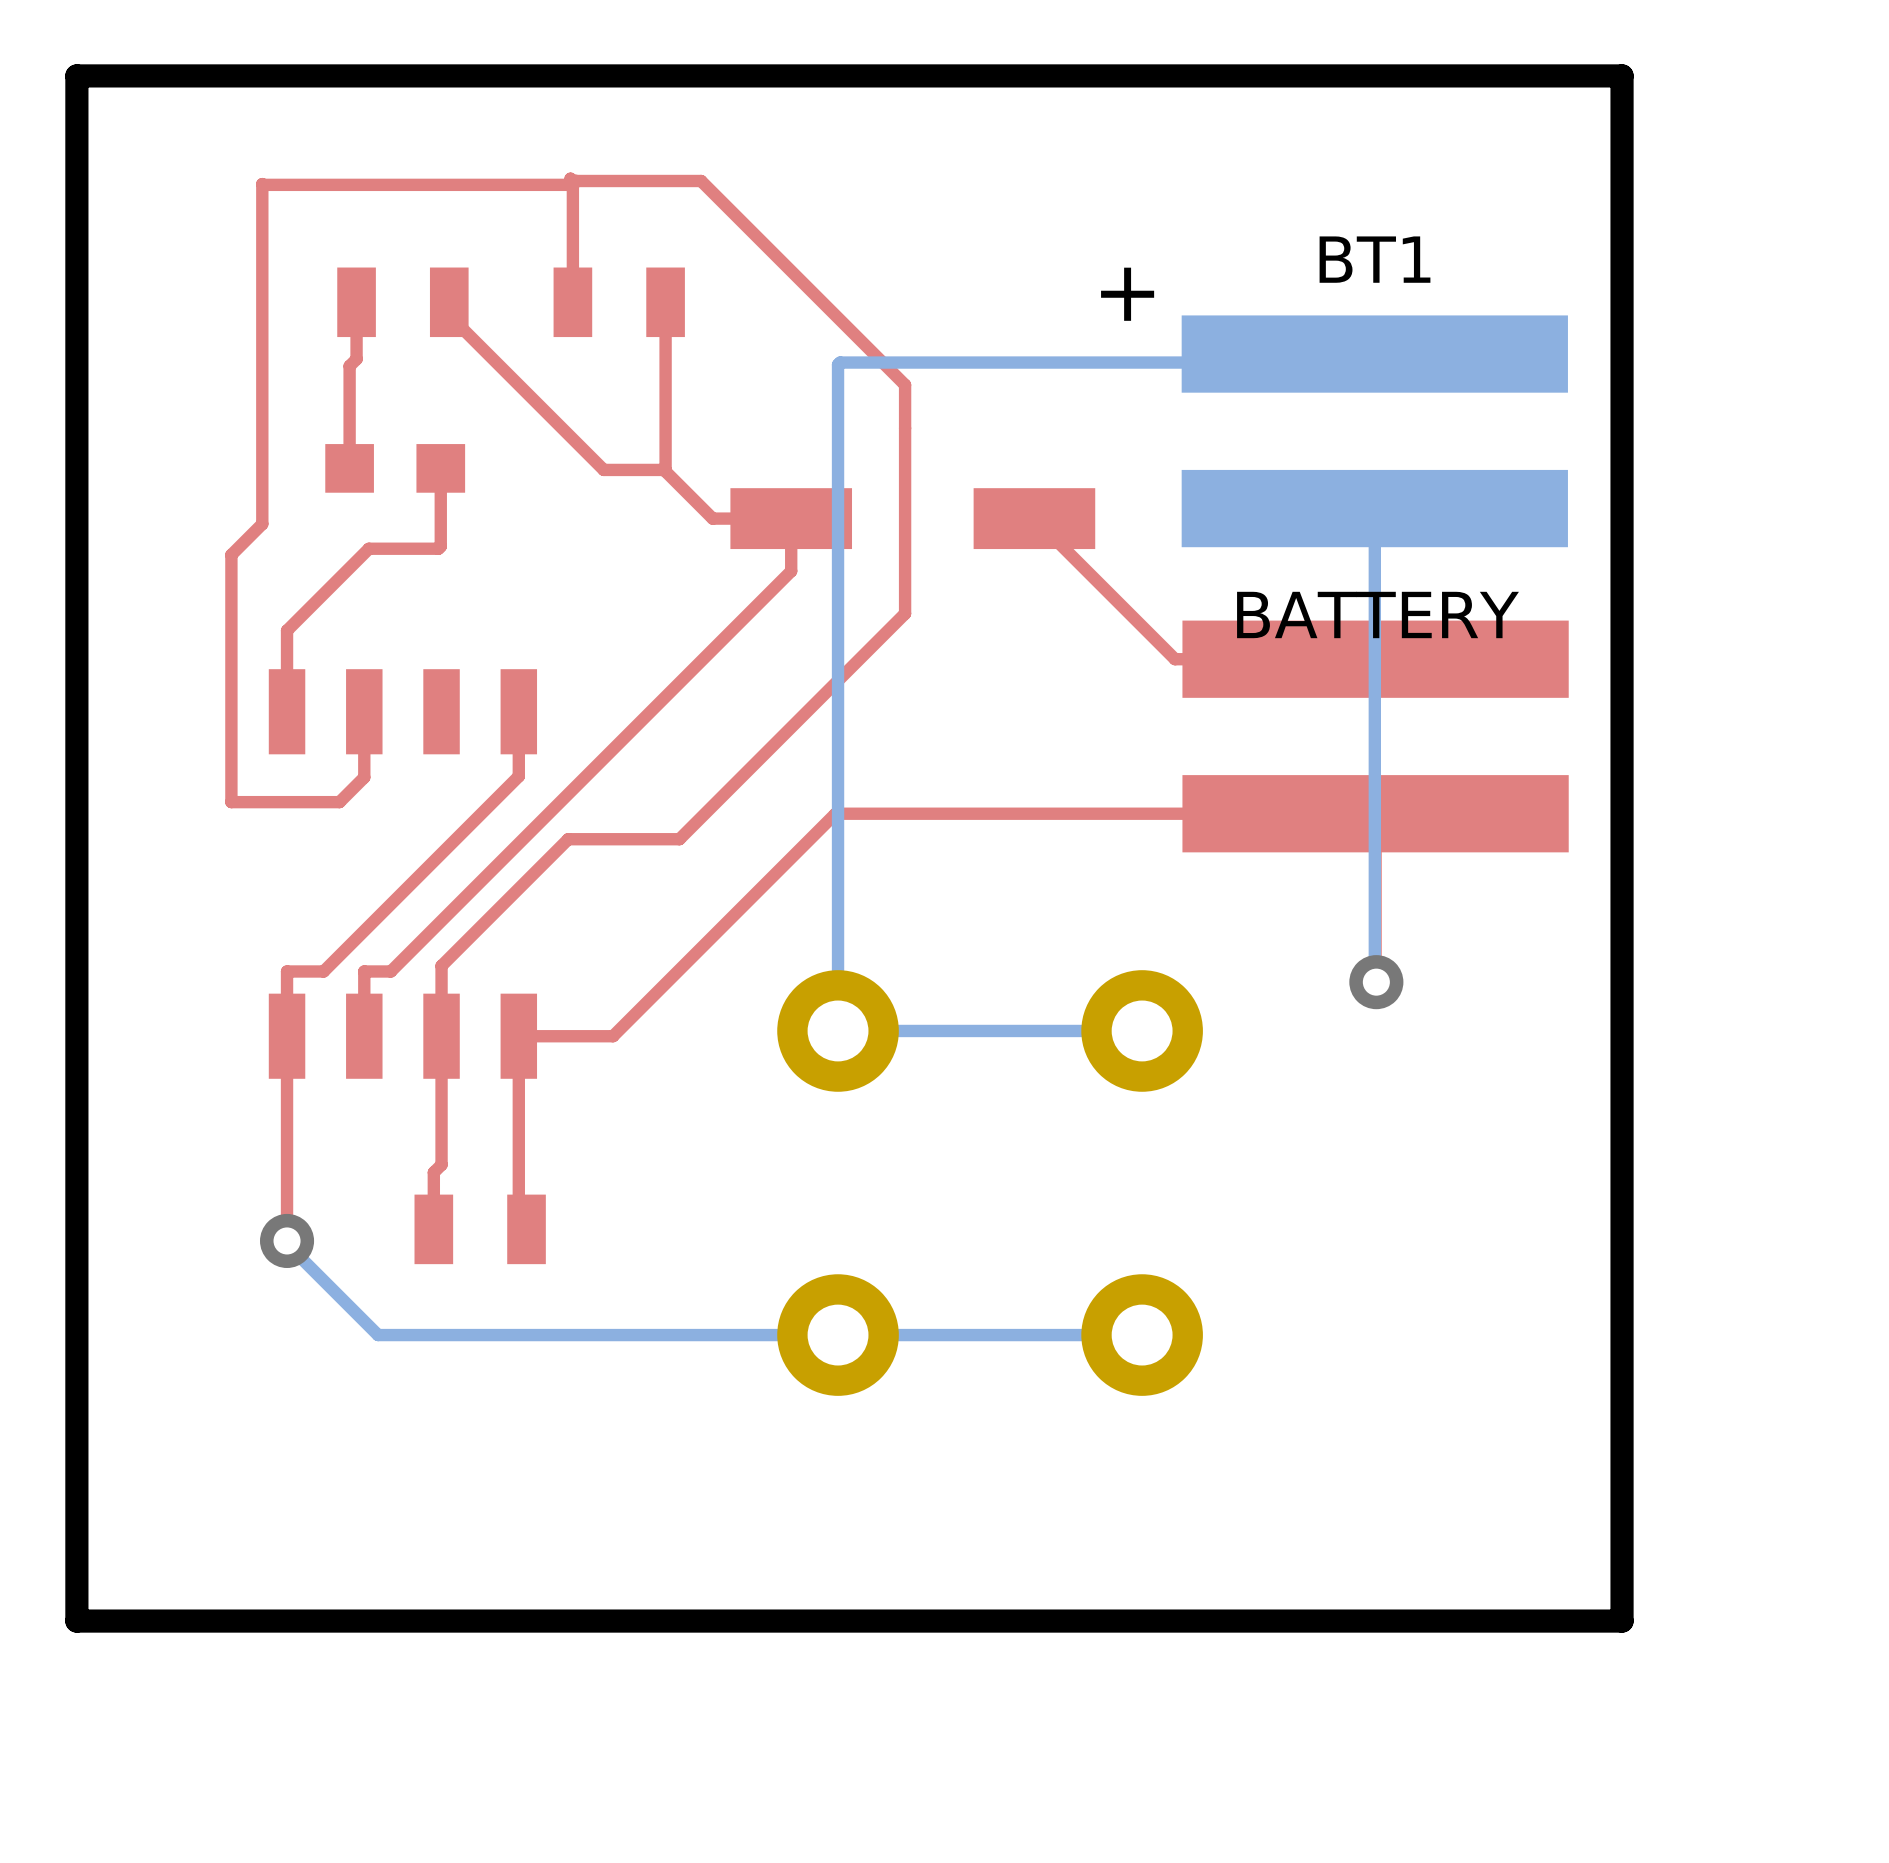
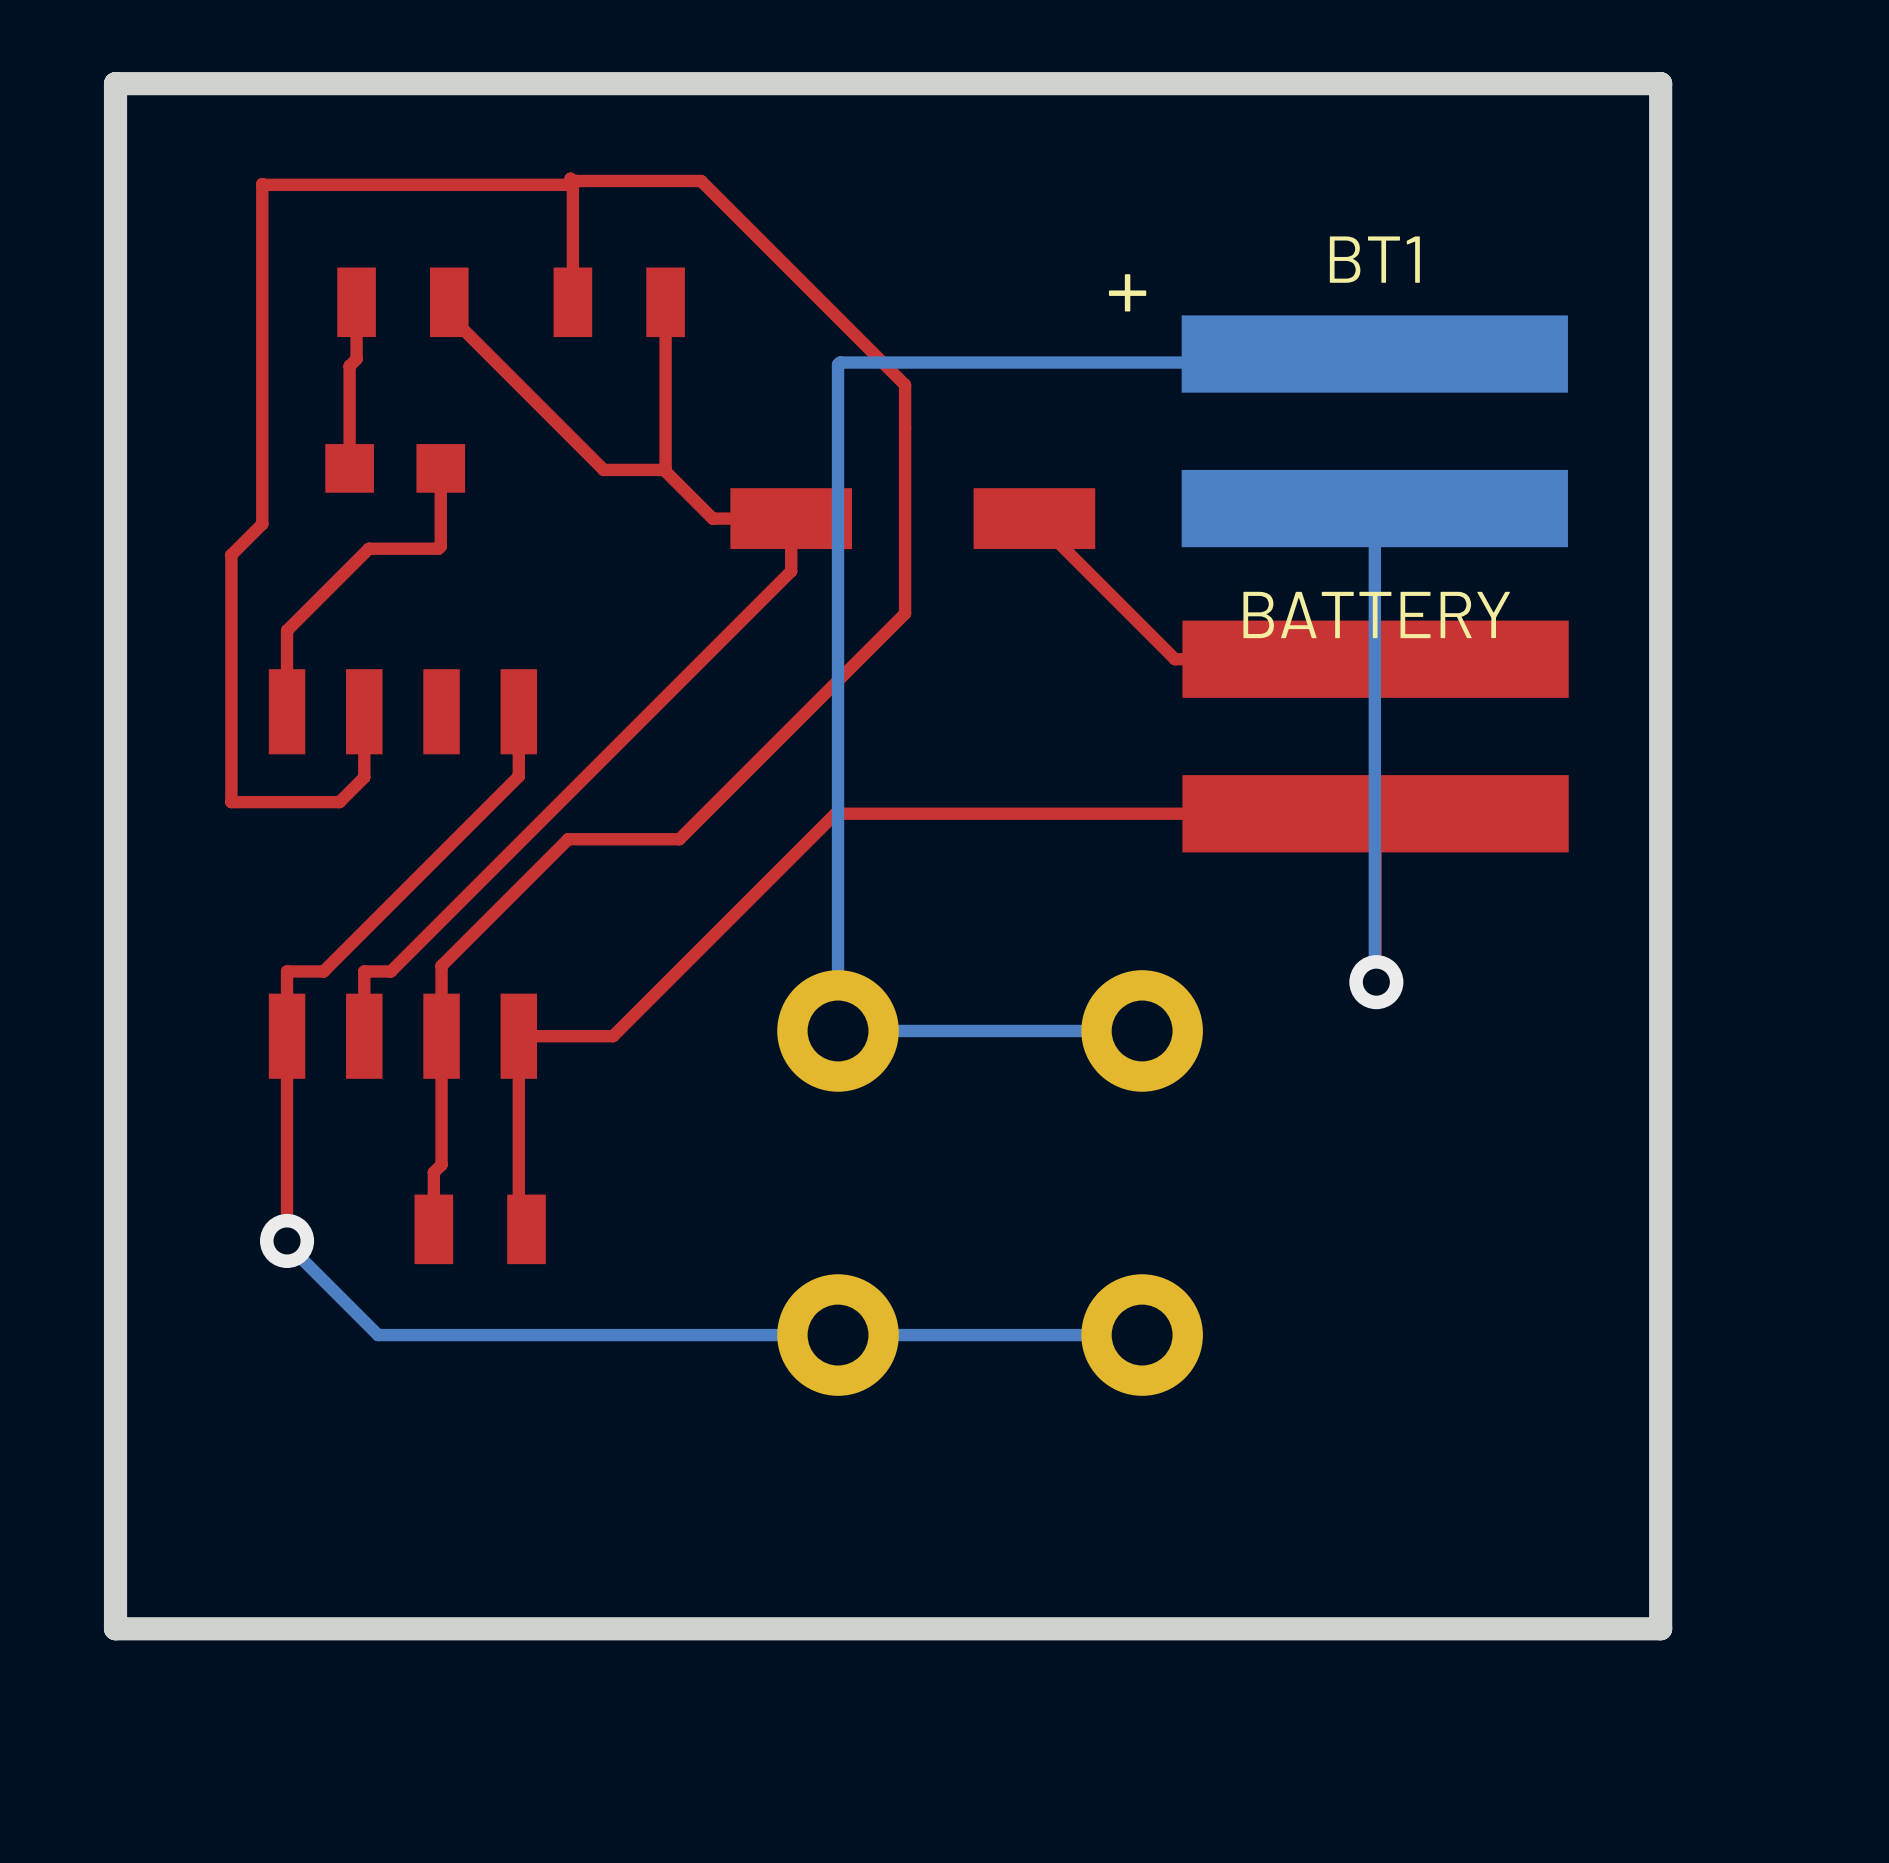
board edge: (1622, 75) (76, 75) (76, 1621) (1622, 1621) (1622, 75) -> (1660, 83) (115, 83) (115, 1628) (1660, 1628) (1660, 83)

